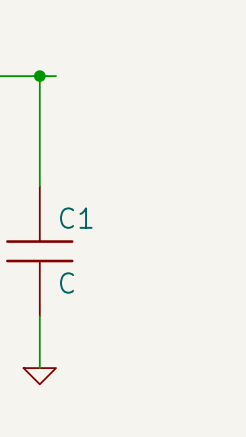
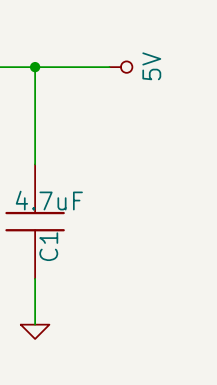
wire: none -> (49, 67) (109, 67)
power symbol: none -> 5V (120, 67)
C1 name rotation: 0° (76, 218) -> 90° counterclockwise (48, 246)
C1 name position: C1 (76, 218) -> C1 (48, 246)
C1 value: C (67, 283) -> 4.7uF (49, 200)

